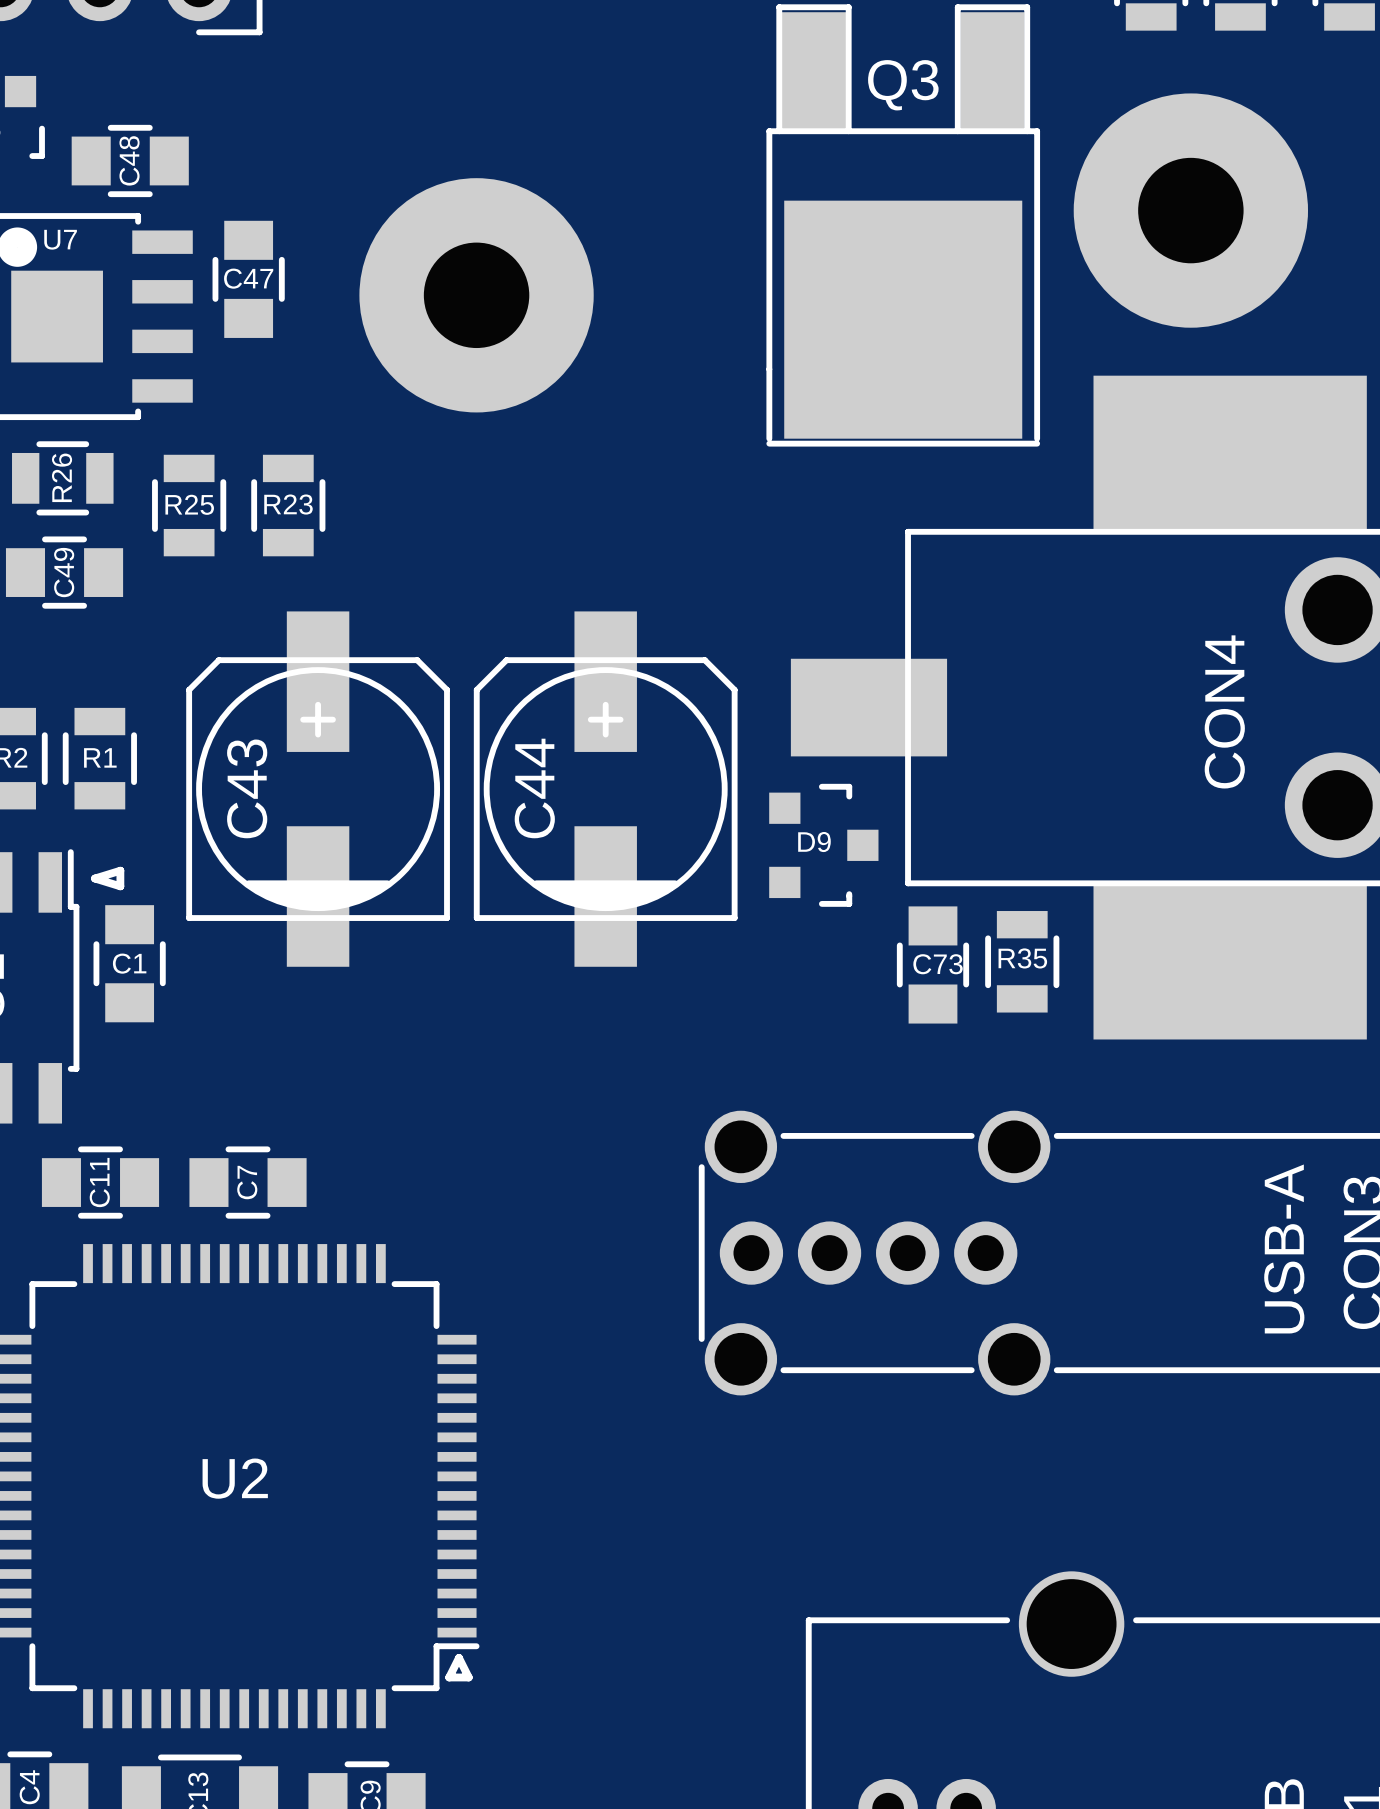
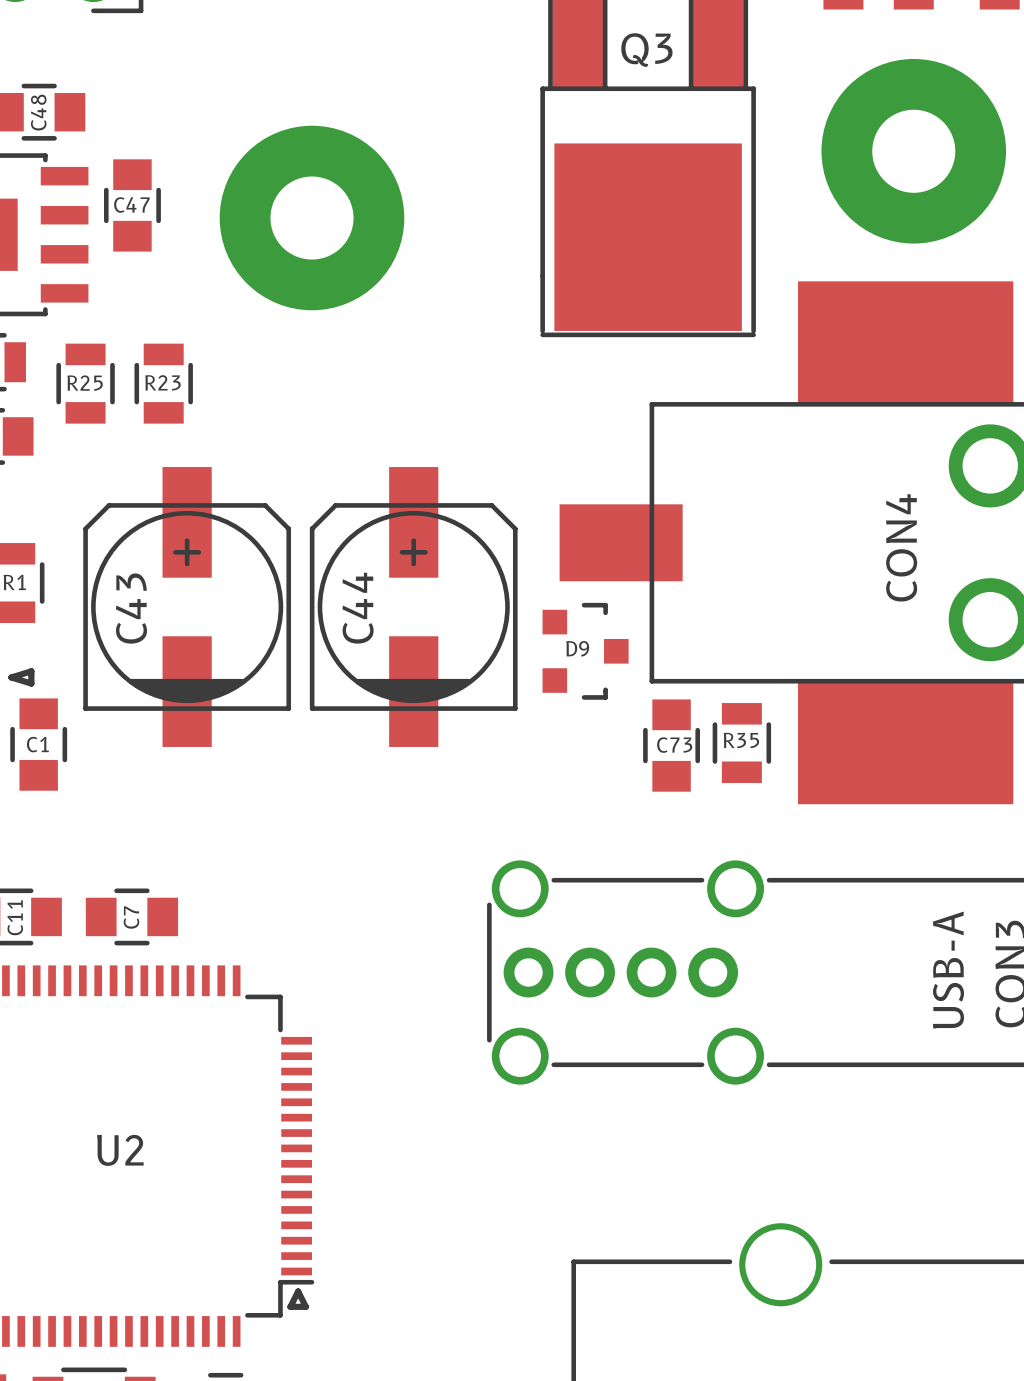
part position: (1190, 210) -> (913, 151)

